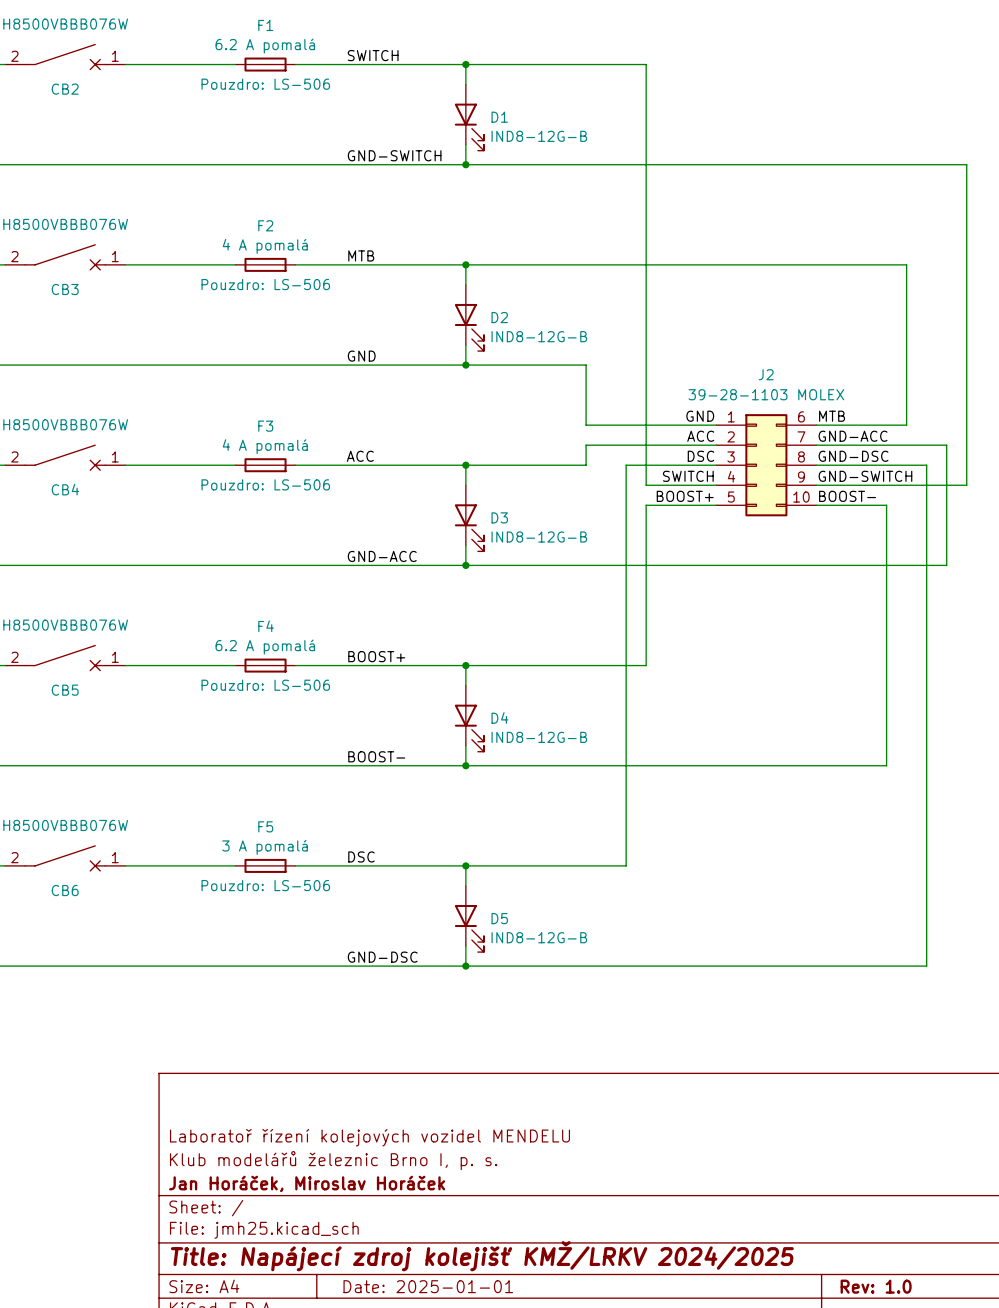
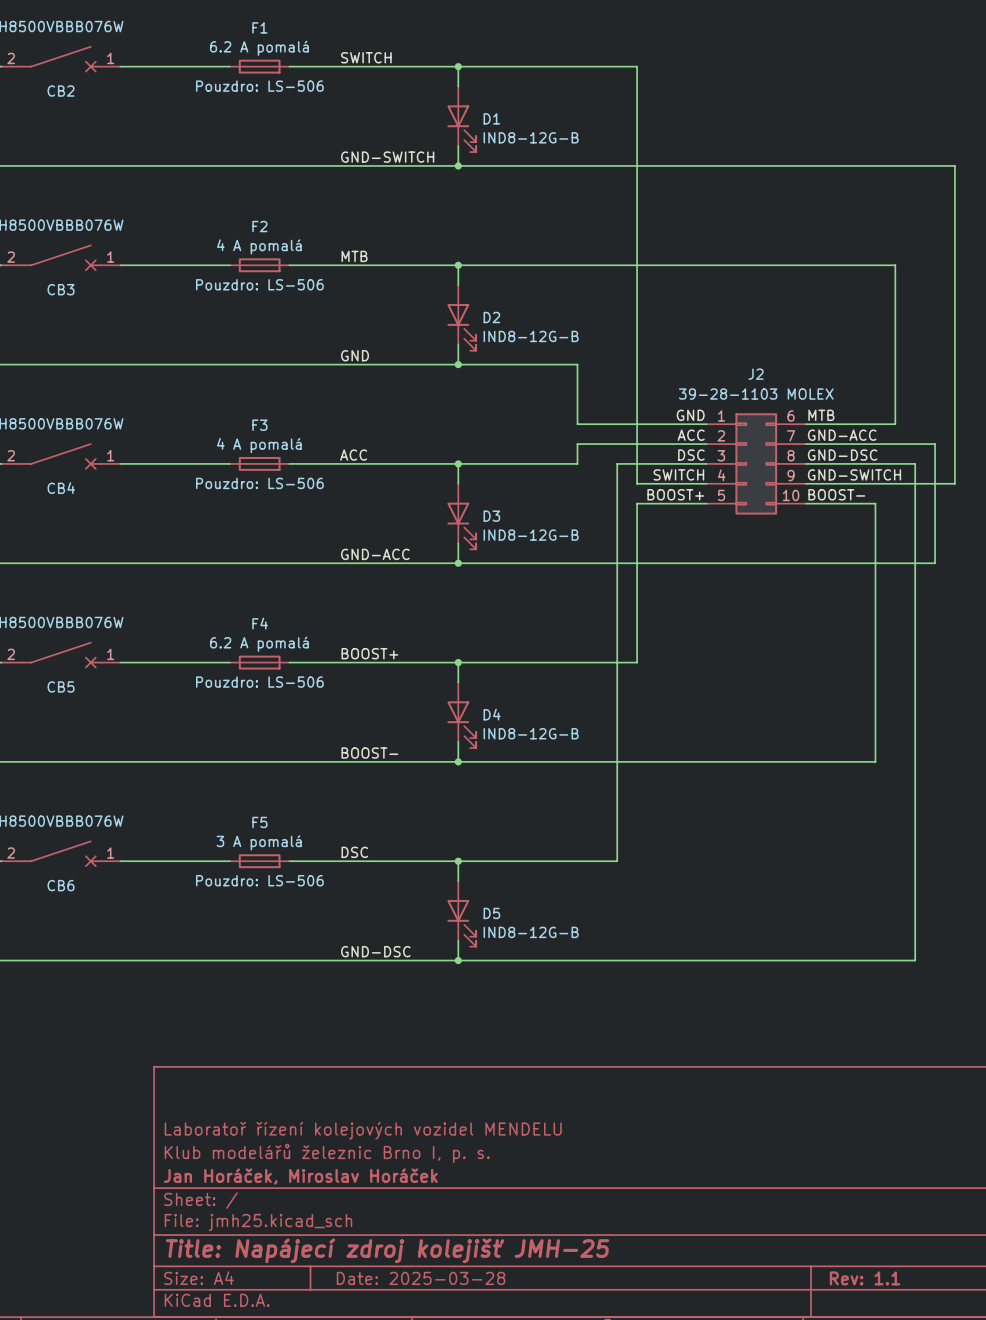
title block: Title: Napájecí zdroj kolejišť KMŽ/LRKV 2024/2025 (482, 1256) -> Title: Napájecí zdroj kolejišť JMH-25 (387, 1250)
title block: Date: 2025-01-01 (428, 1286) -> Date: 2025-03-28 (421, 1278)
title block: Rev: 1.0 (876, 1286) -> Rev: 1.1 (865, 1278)

